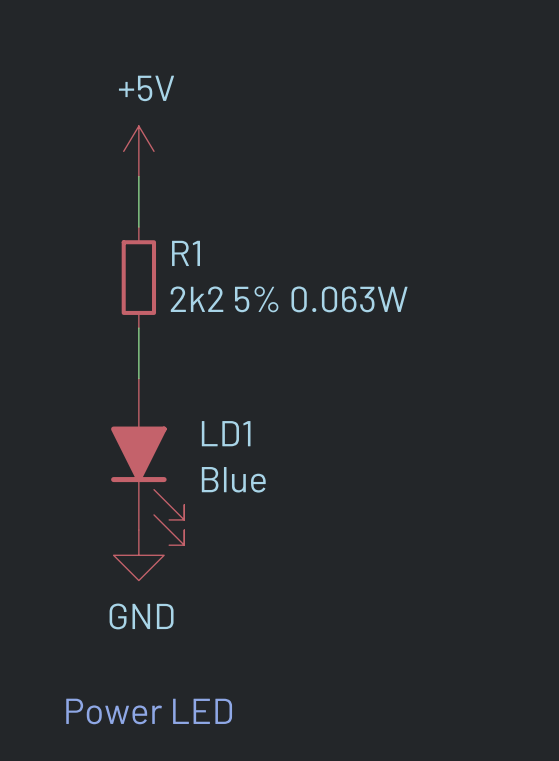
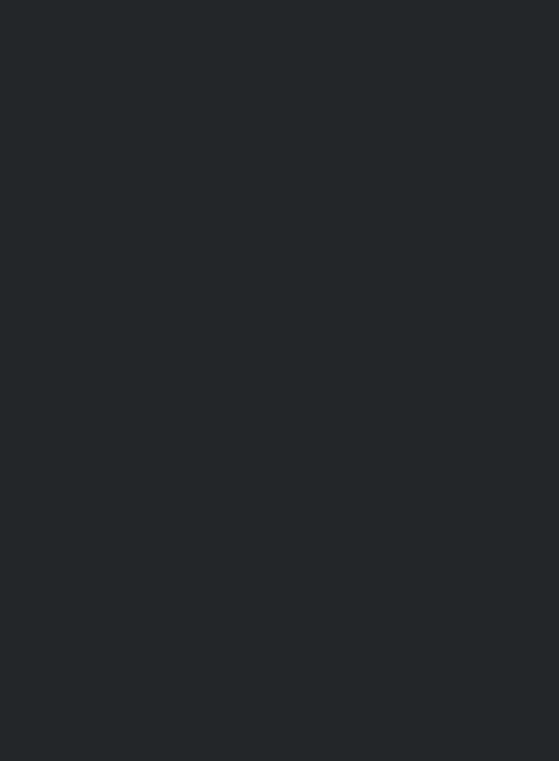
power symbol: +5V (138, 151) -> none
wire: (138, 176) (138, 227) -> none
R1: 2k2 5% 0.063W (138, 277) -> none
wire: (138, 328) (138, 378) -> none
LD1: Blue (147, 461) -> none
power symbol: GND (138, 555) -> none
text: Power LED (149, 711) -> none

